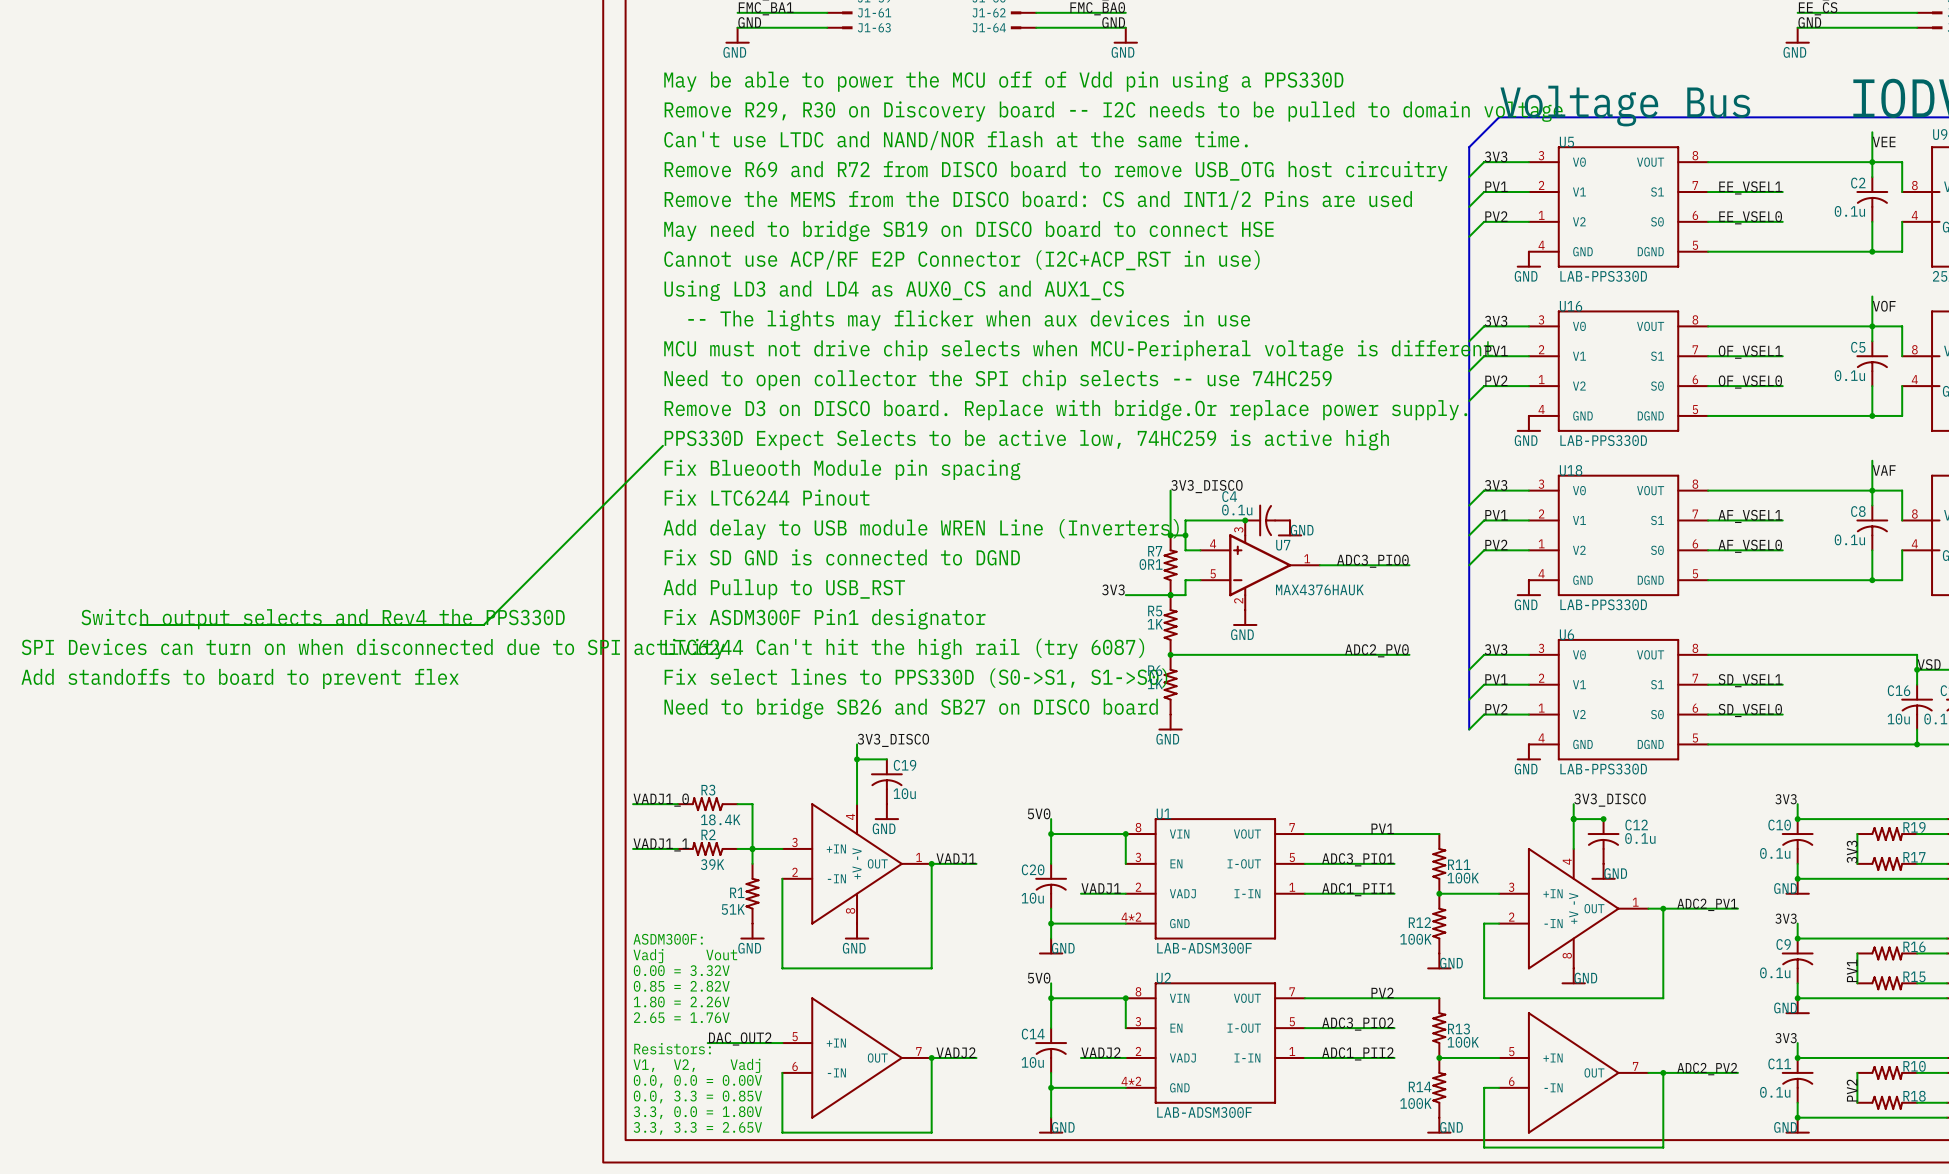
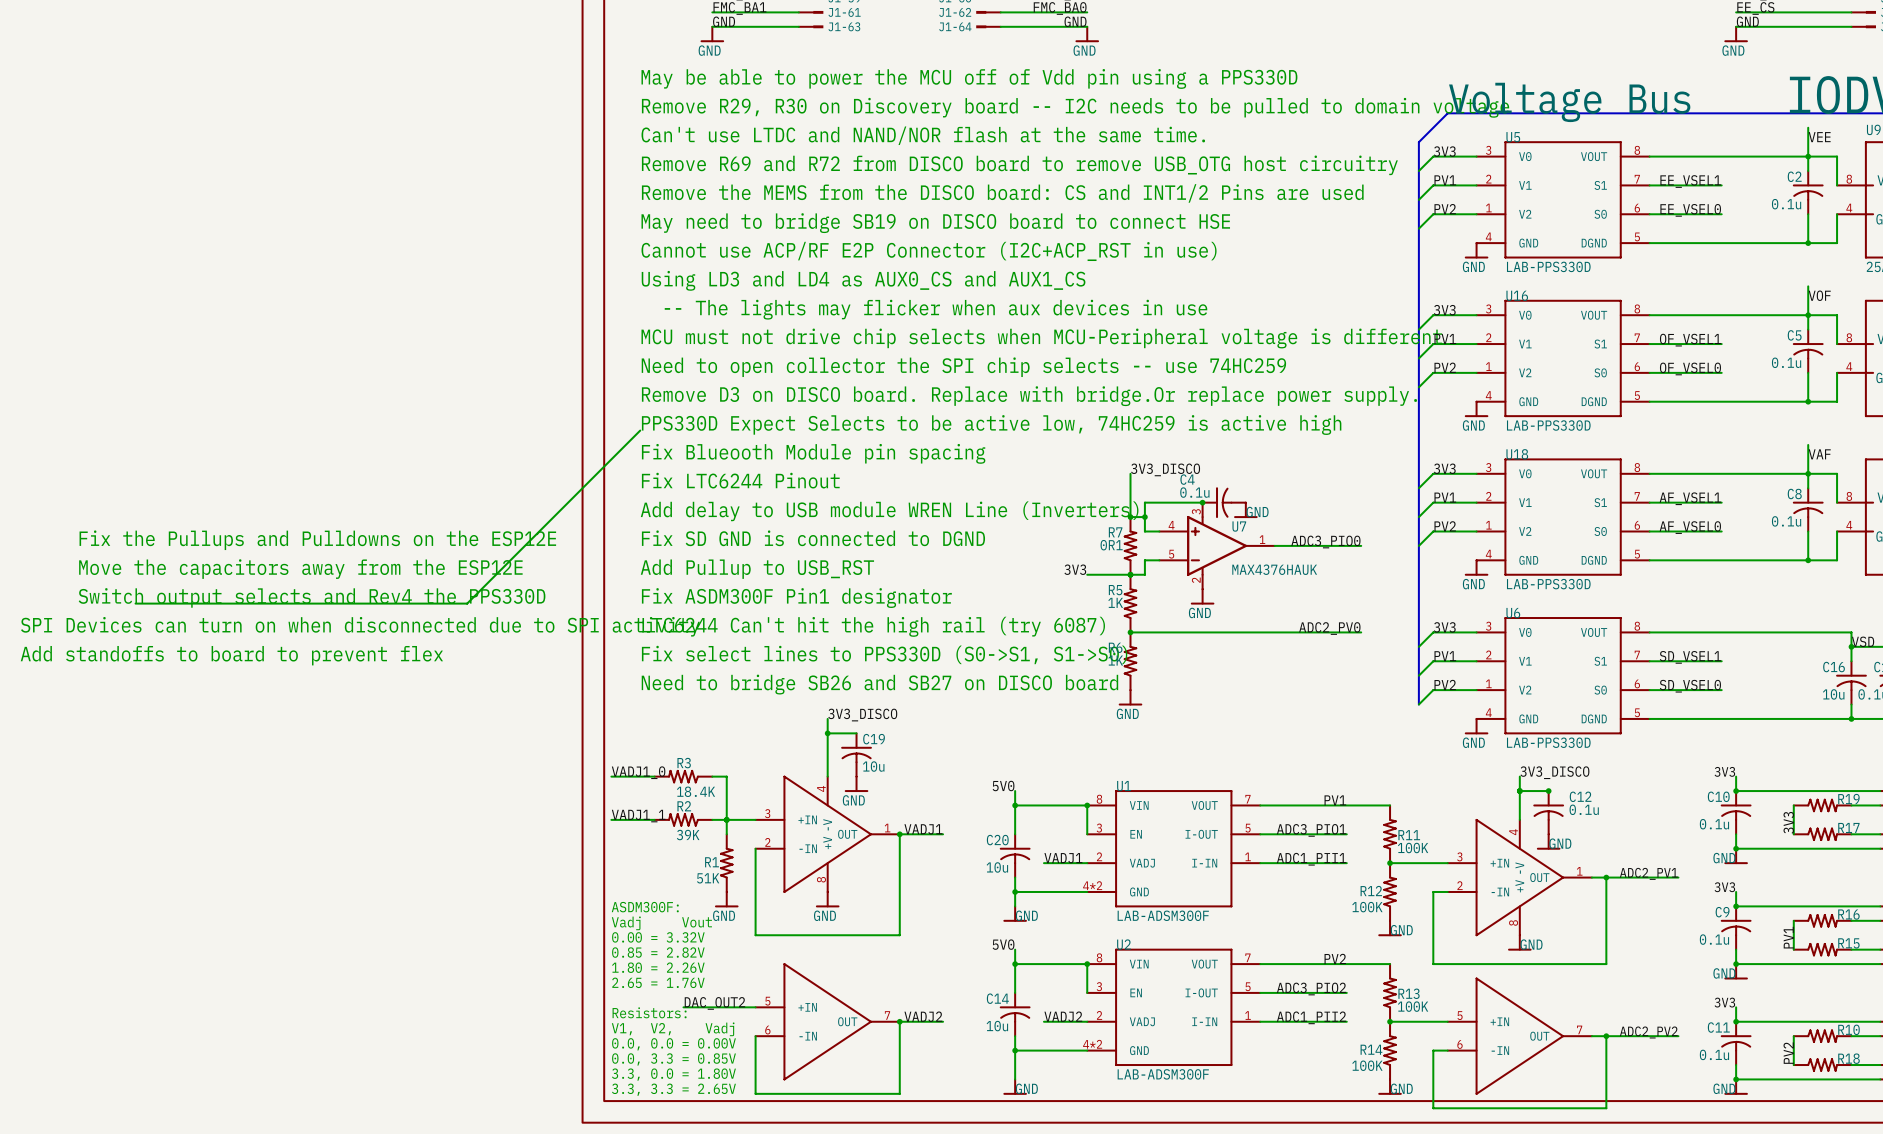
text: none -> Fix the Pullups and Pulldowns on the ESP12E (317, 540)
text: none -> Move the capacitors away from the ESP12E (300, 569)

